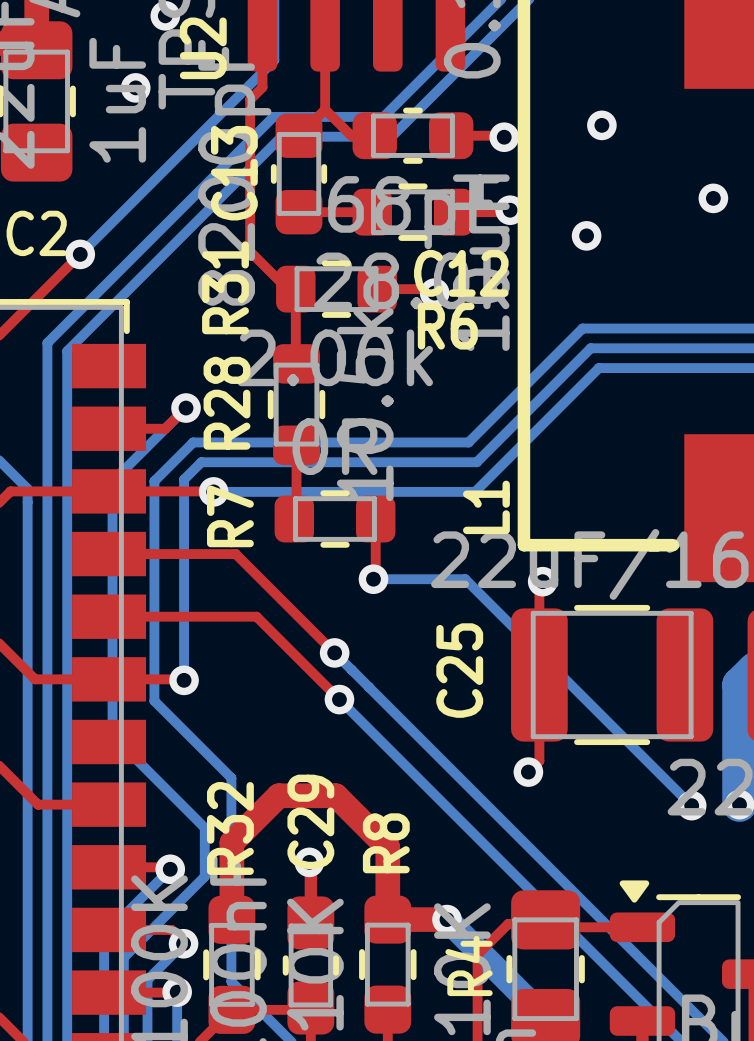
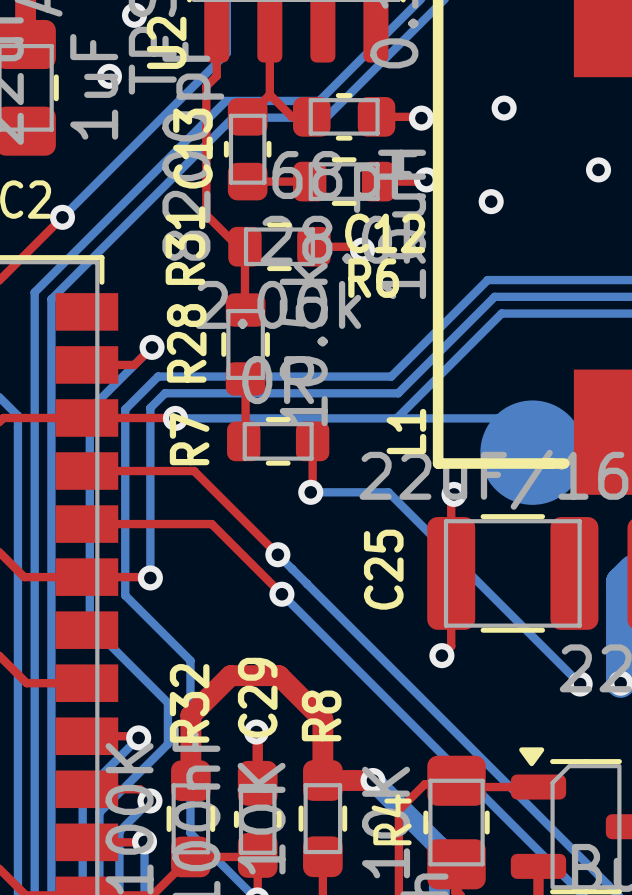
bottom track: none -> (396, 418) (498, 418) (532, 452)
part: none -> (532, 452)

